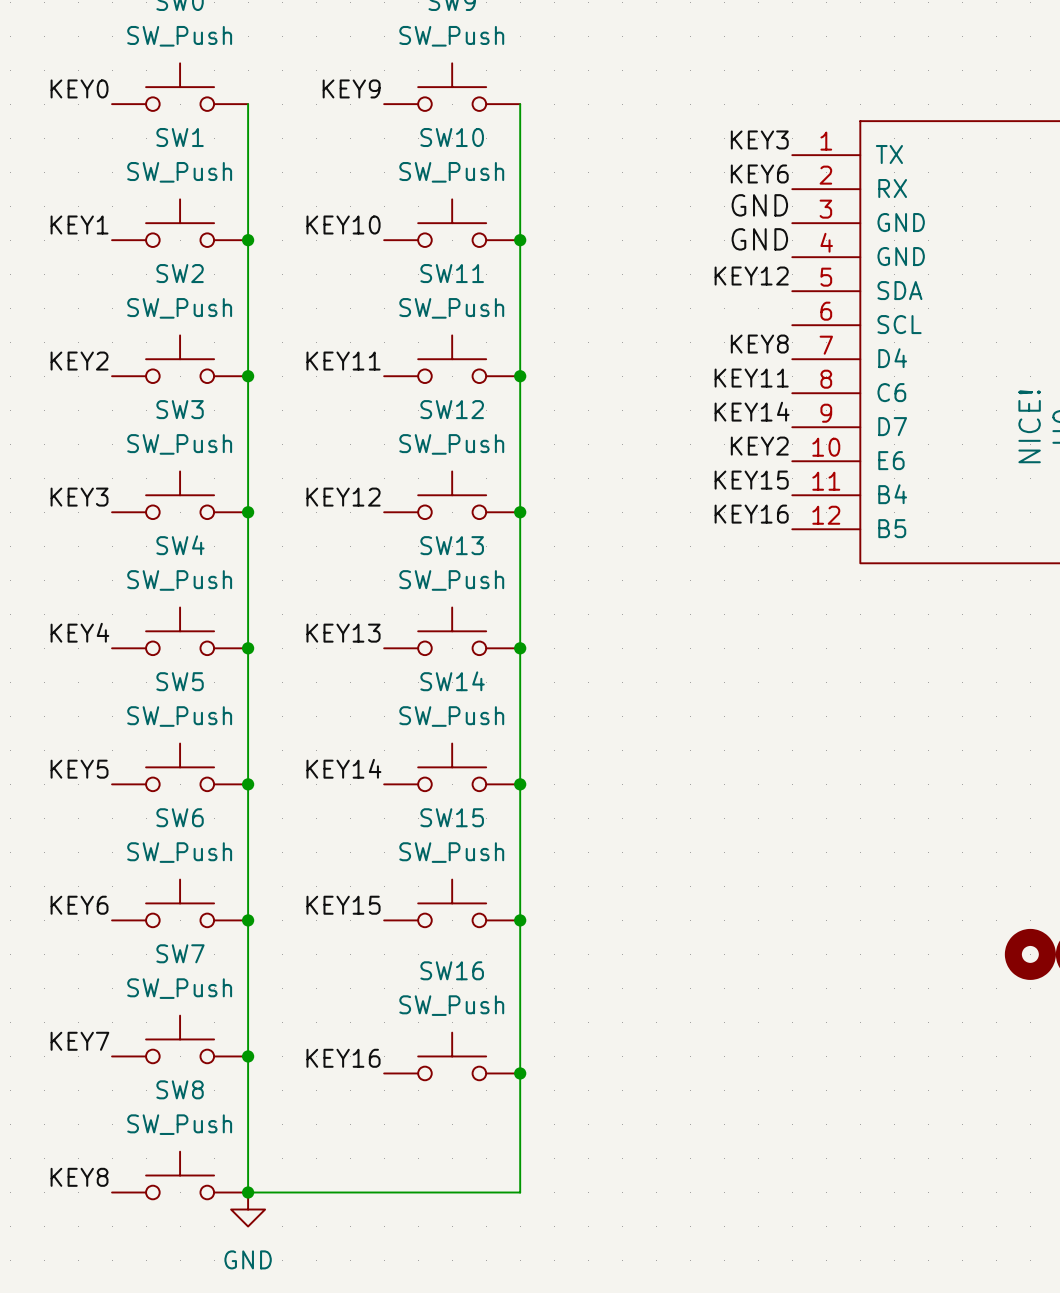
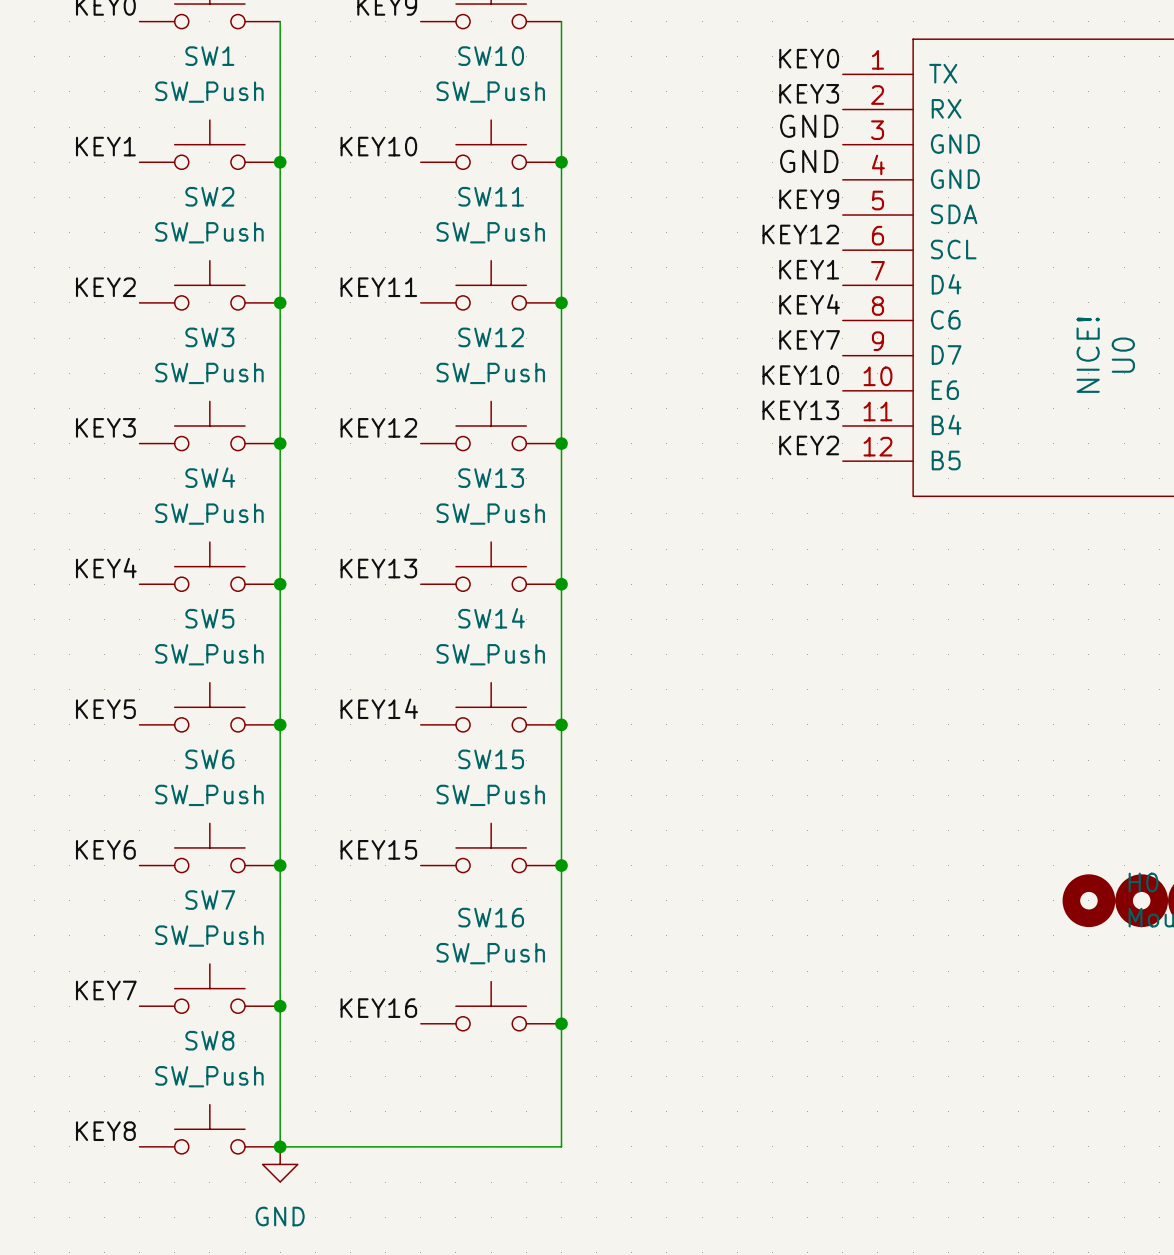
label: KEY3 (759, 139) -> KEY0 (809, 58)
label: KEY6 (759, 173) -> KEY3 (809, 93)
label: KEY12 (751, 276) -> KEY9 (809, 199)
label: none -> KEY12 (800, 234)
label: KEY8 (759, 344) -> KEY1 (809, 269)
label: KEY11 (751, 378) -> KEY4 (809, 304)
label: KEY14 (752, 411) -> KEY7 (809, 339)
label: KEY2 (759, 446) -> KEY10 (800, 375)
label: KEY15 (751, 480) -> KEY13 (800, 410)
label: KEY16 (751, 514) -> KEY2 (809, 445)

